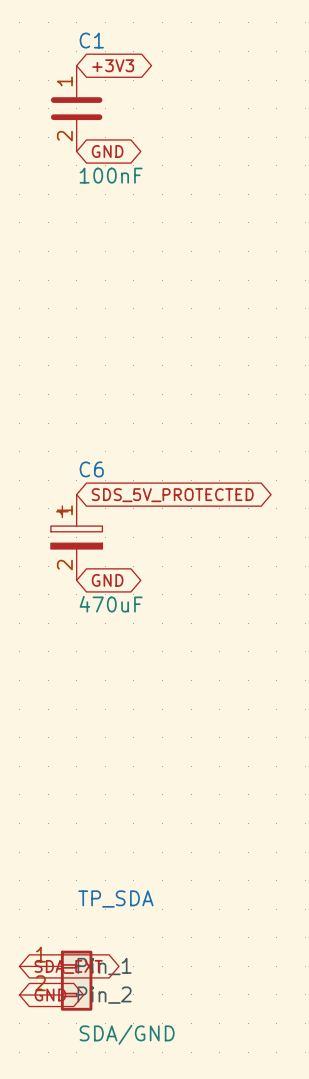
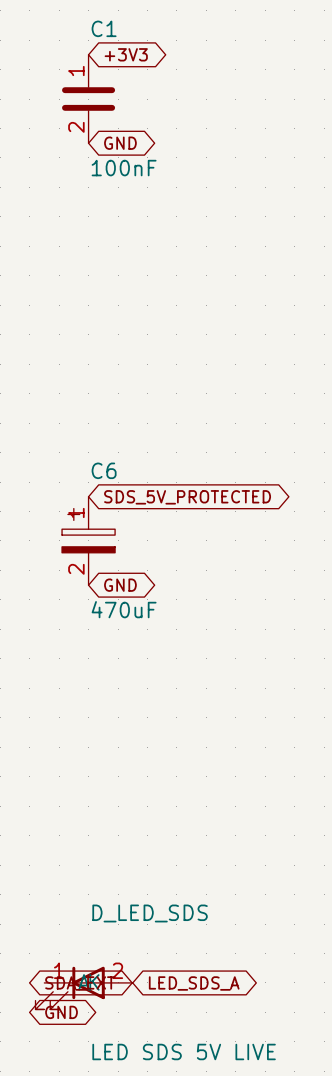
global label: none -> LED_SDS_A (194, 983)
D_LED_SDS: none -> LED SDS 5V LIVE (84, 988)
TP_SDA: SDA/GND (55, 980) -> none

